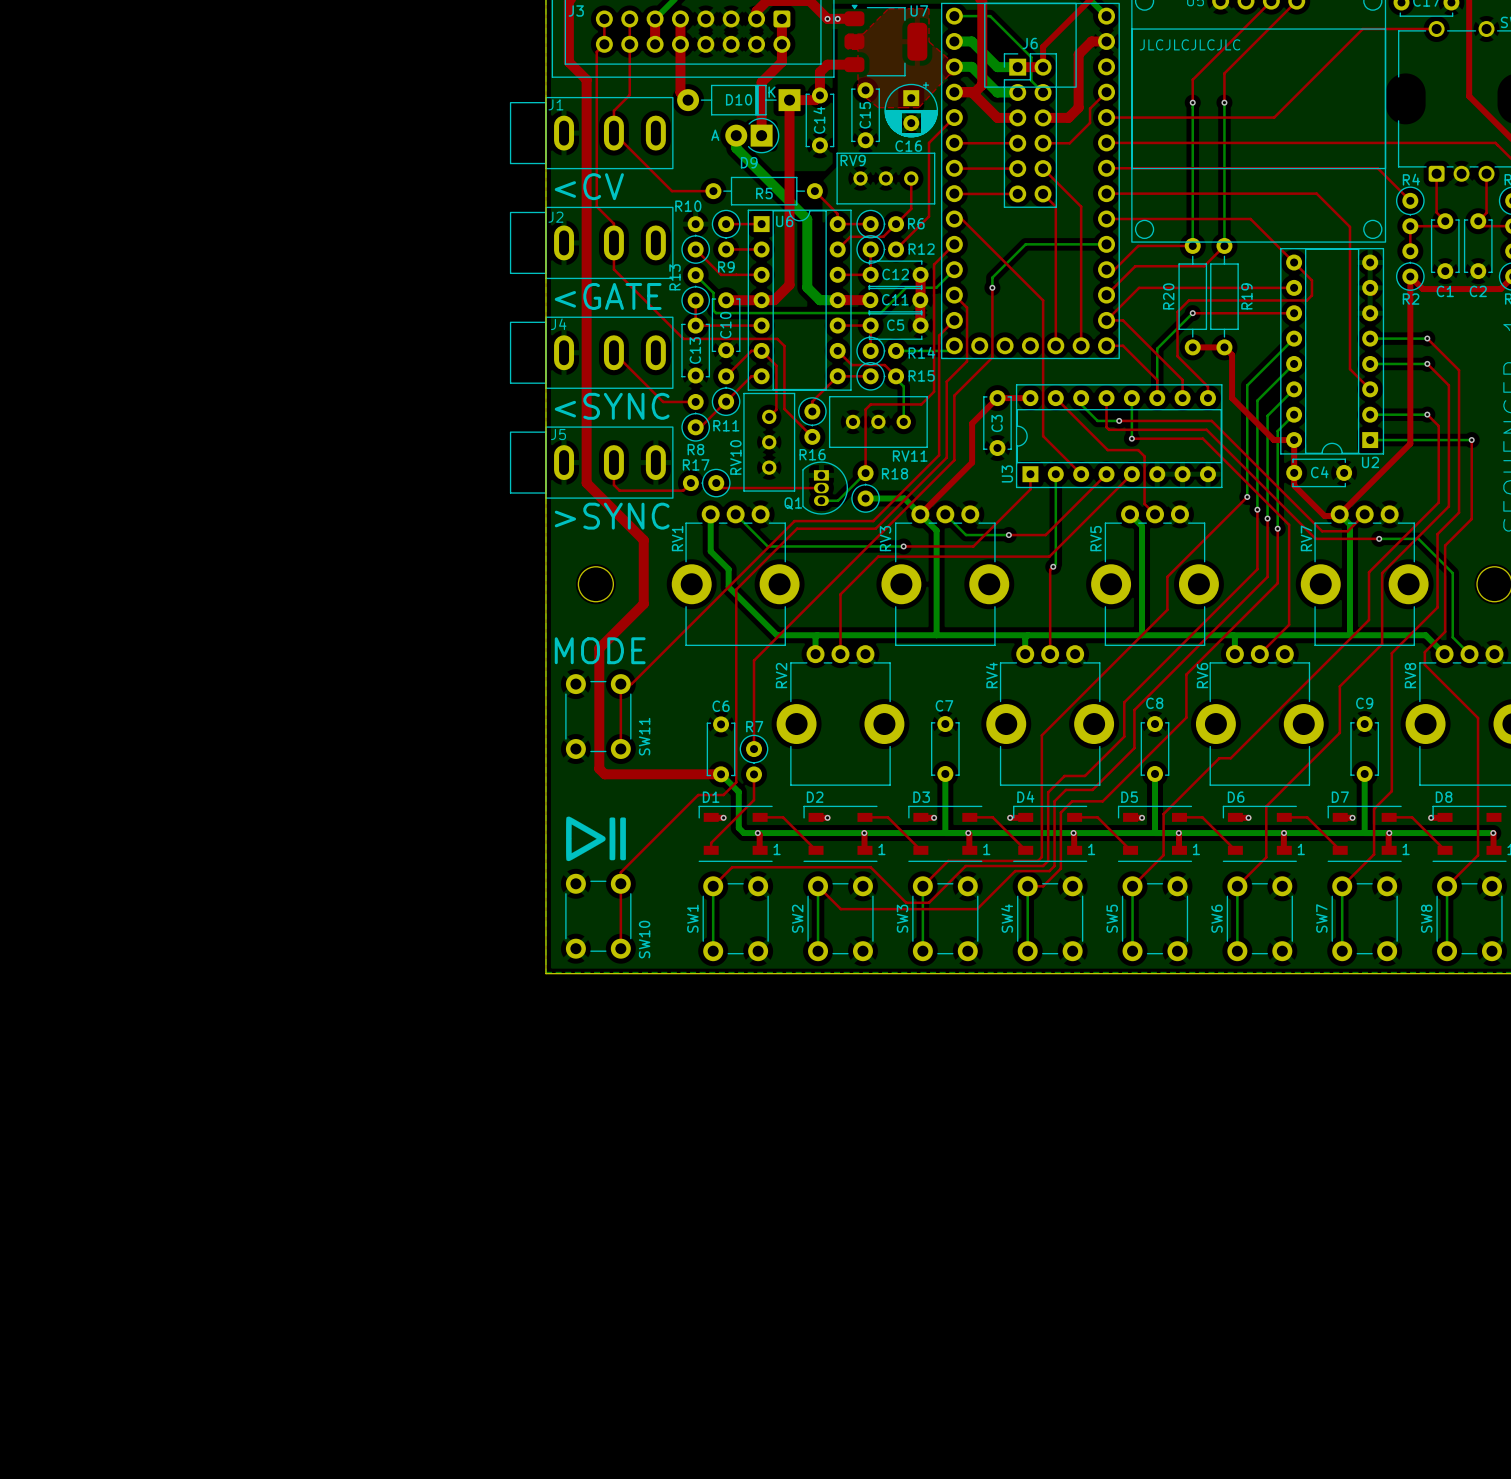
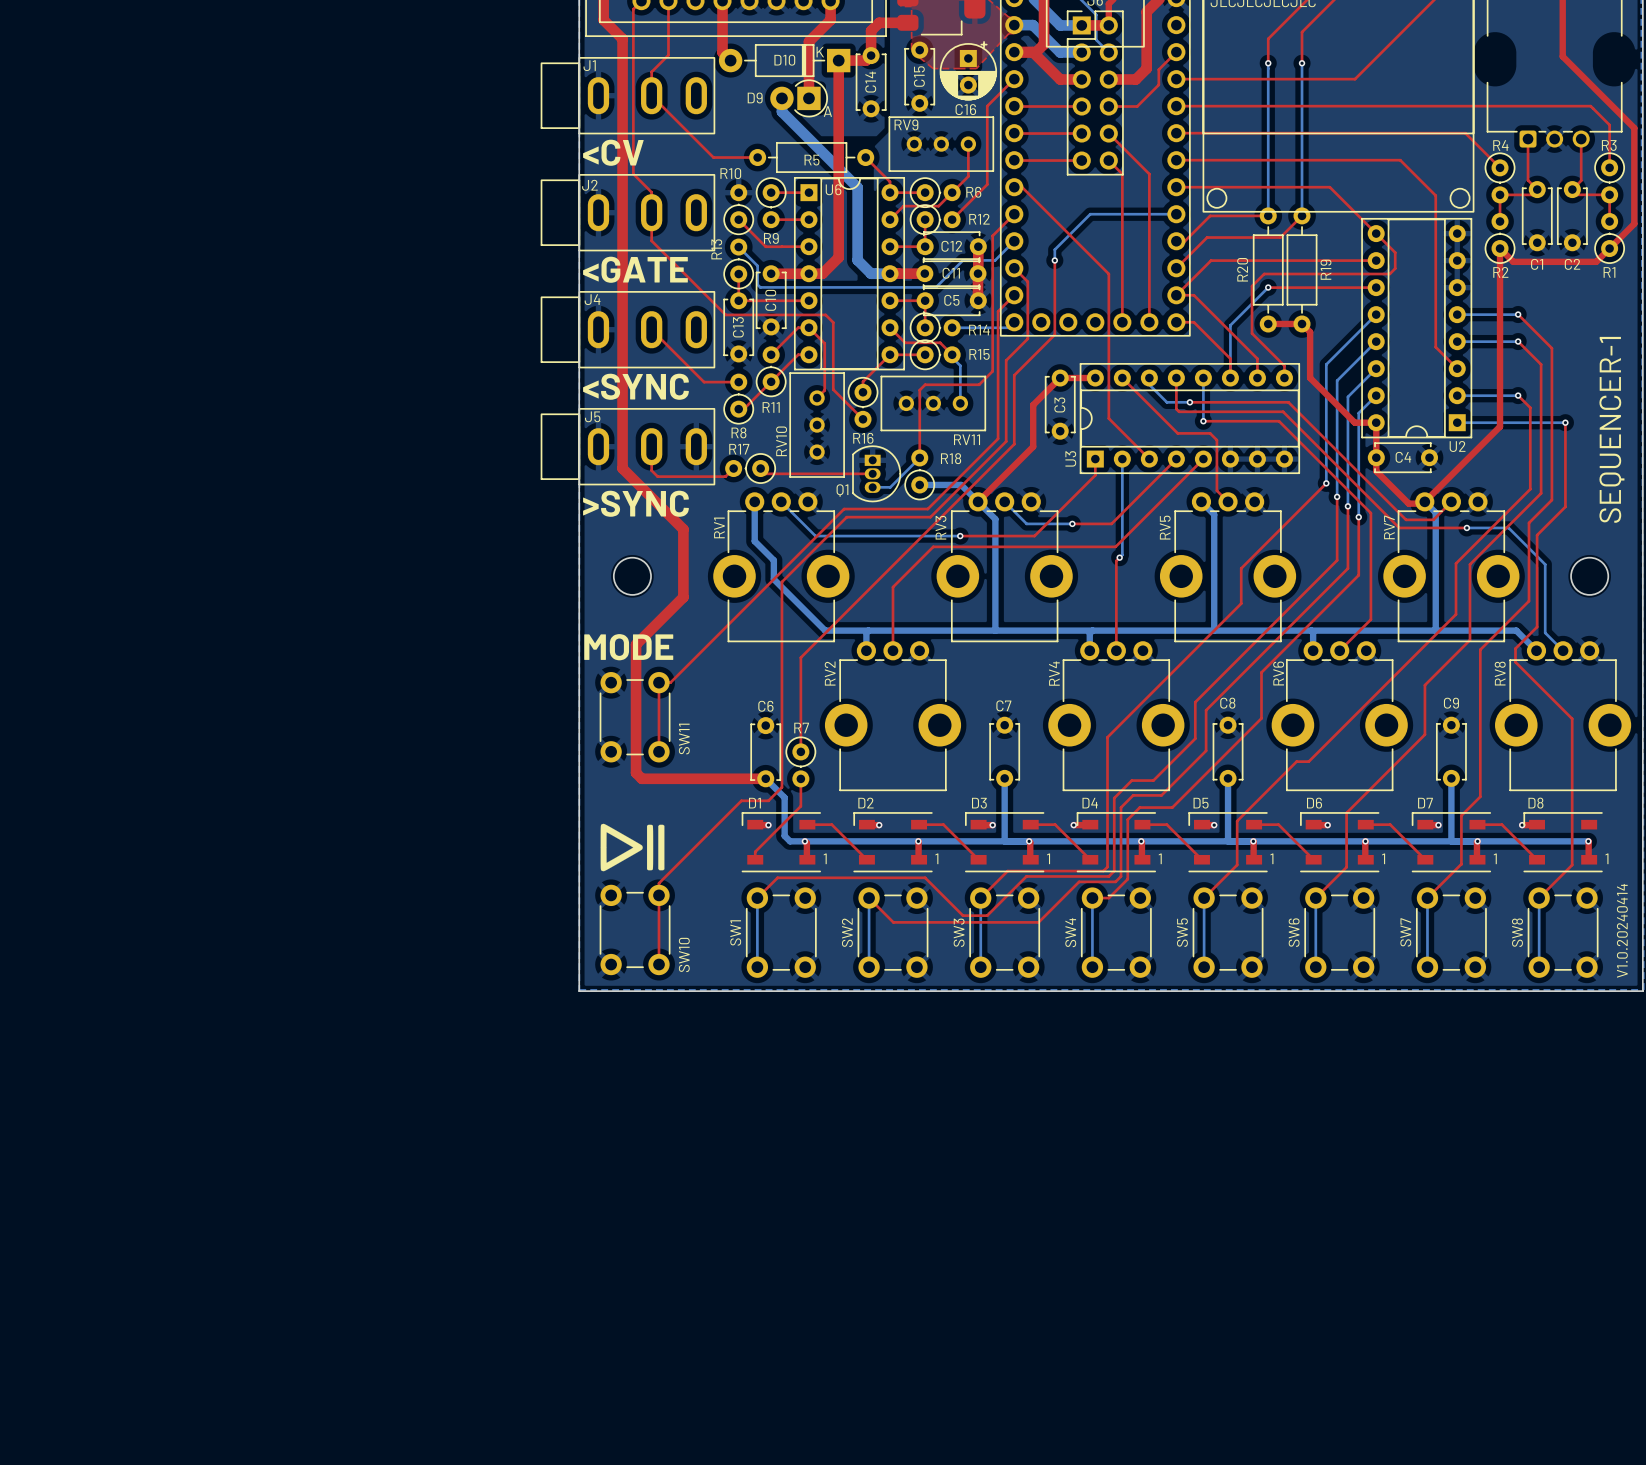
D9 text position: A (715, 135) -> A (827, 111)
D9 name position: D9 (749, 162) -> D9 (755, 98)

